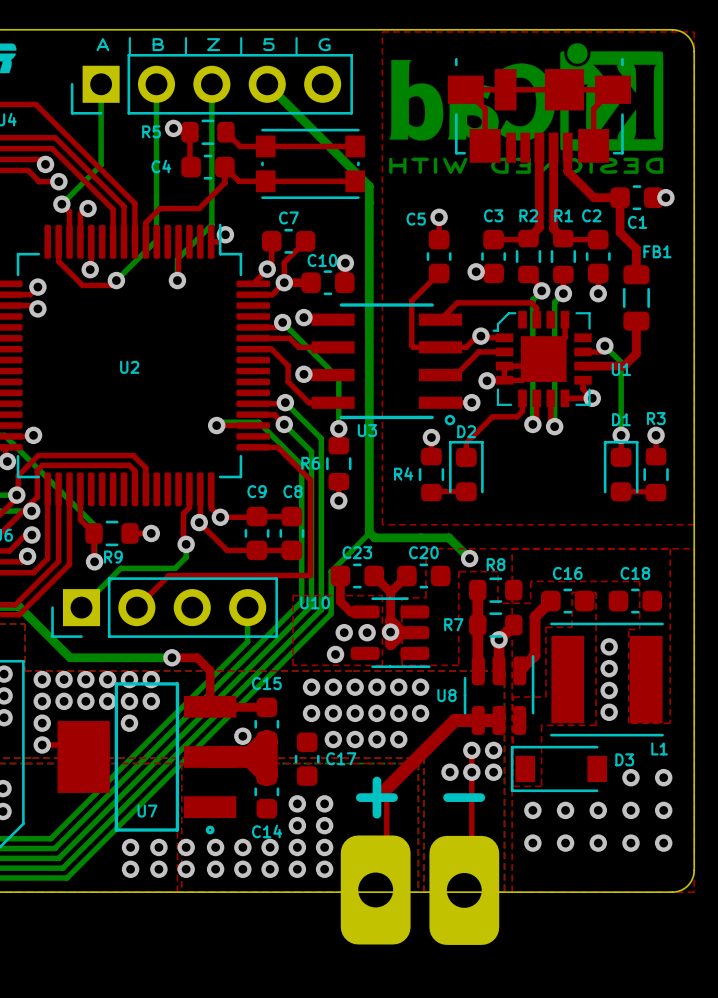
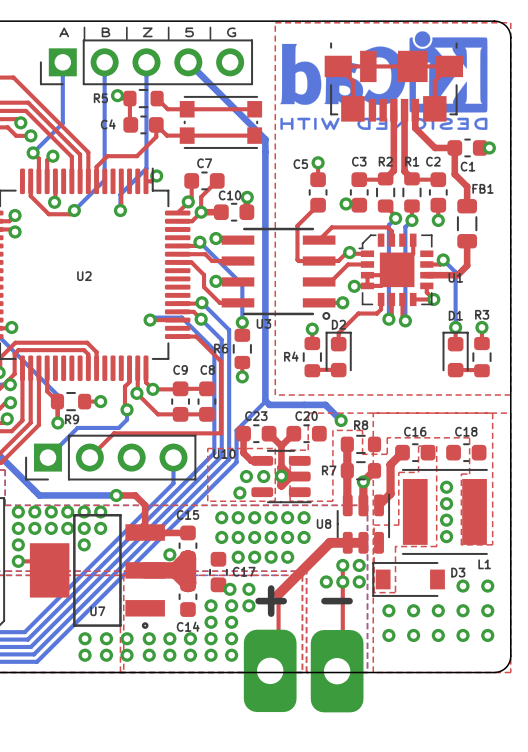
via: none -> (229, 589)
via: none -> (248, 589)
via: none -> (248, 605)

